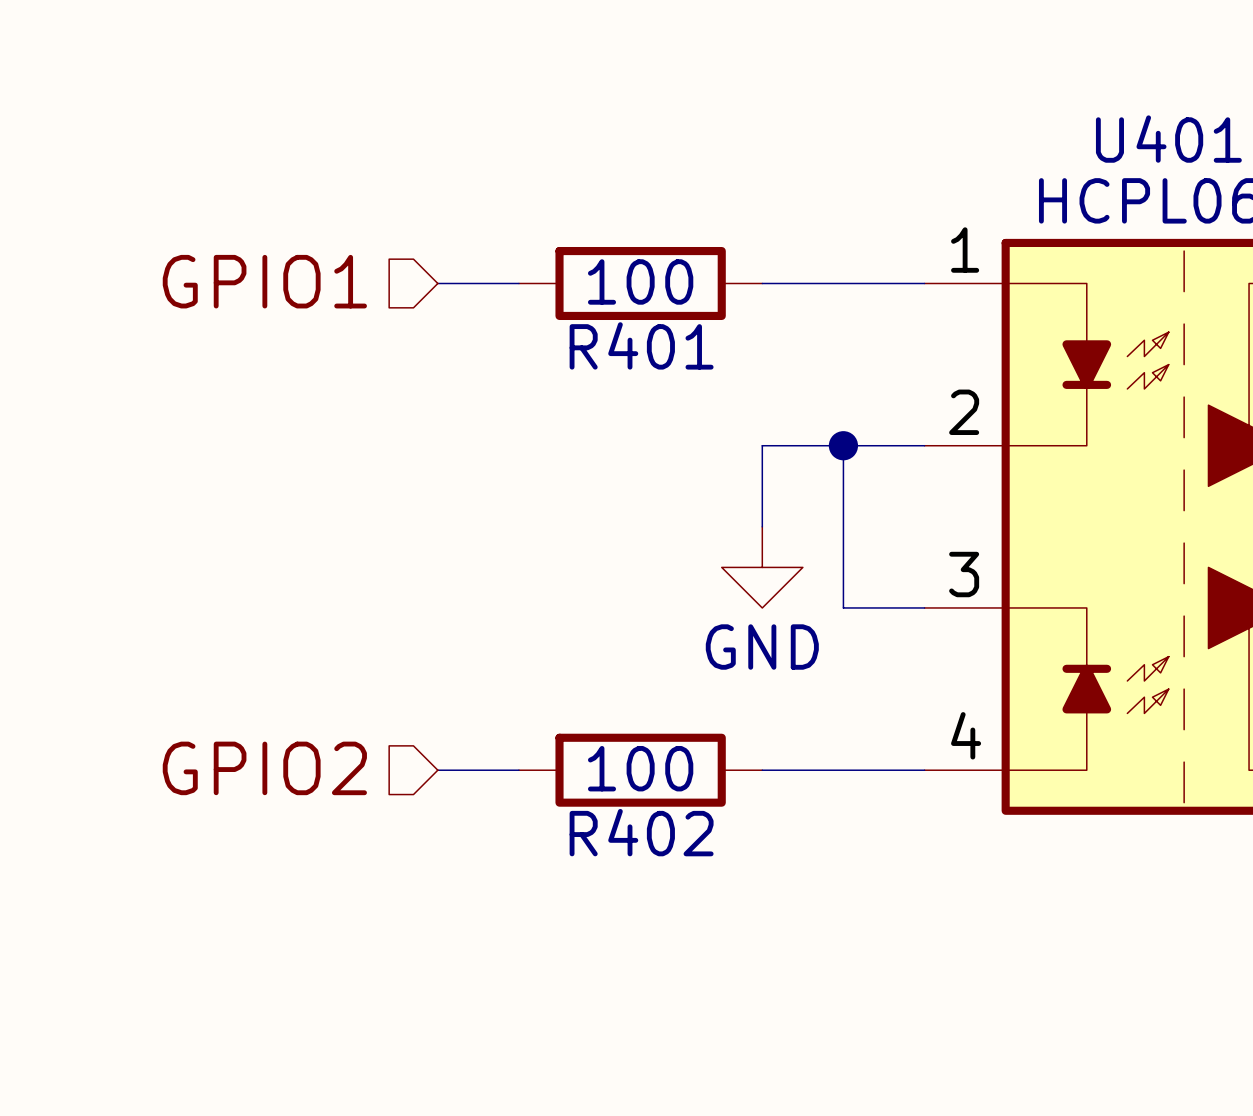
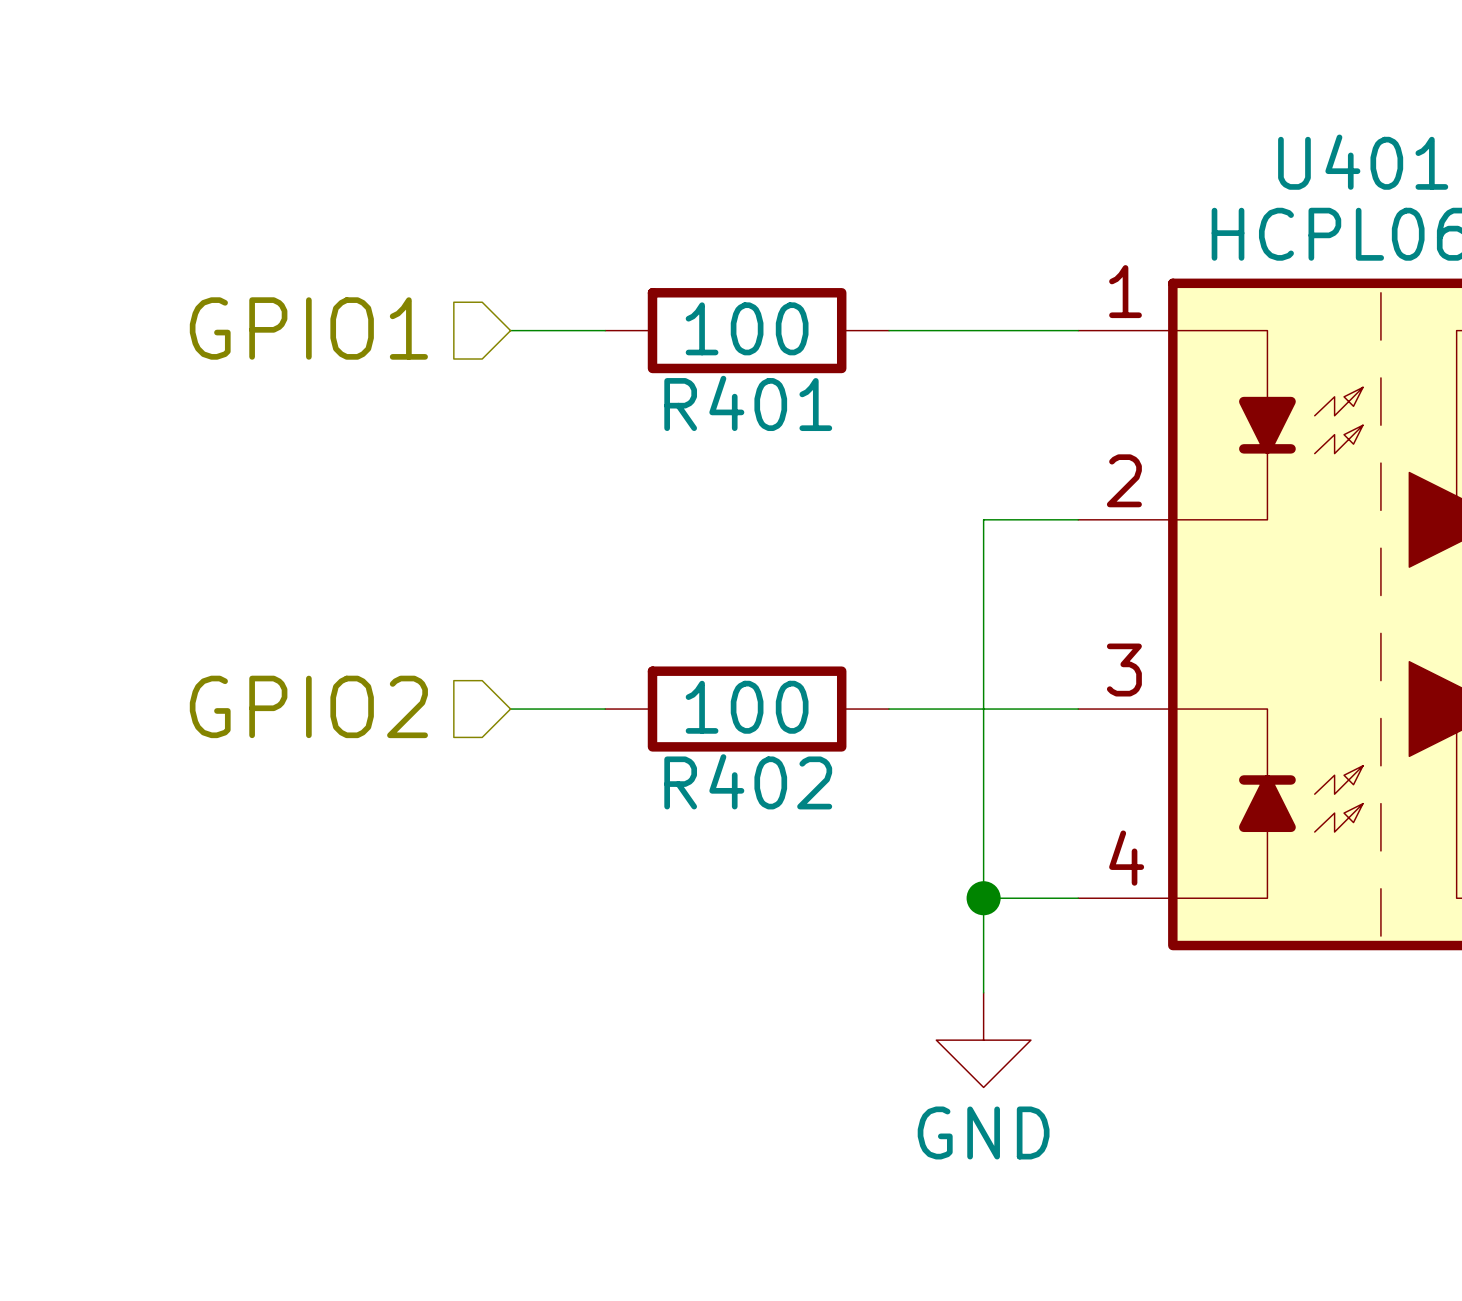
wire: (843, 445) (762, 445) (762, 526) -> none
junction: (843, 445) -> none
power symbol position: GND (762, 567) -> GND (983, 1040)
wire: none -> (889, 709) (983, 709) (983, 992)
hierarchical label position: GPIO2 (264, 768) -> GPIO2 (308, 706)
wire: (437, 770) (518, 770) -> (510, 709) (605, 709)
R402 position: (640, 770) -> (747, 709)
wire: (762, 770) (843, 770) -> none
junction: none -> (983, 898)

